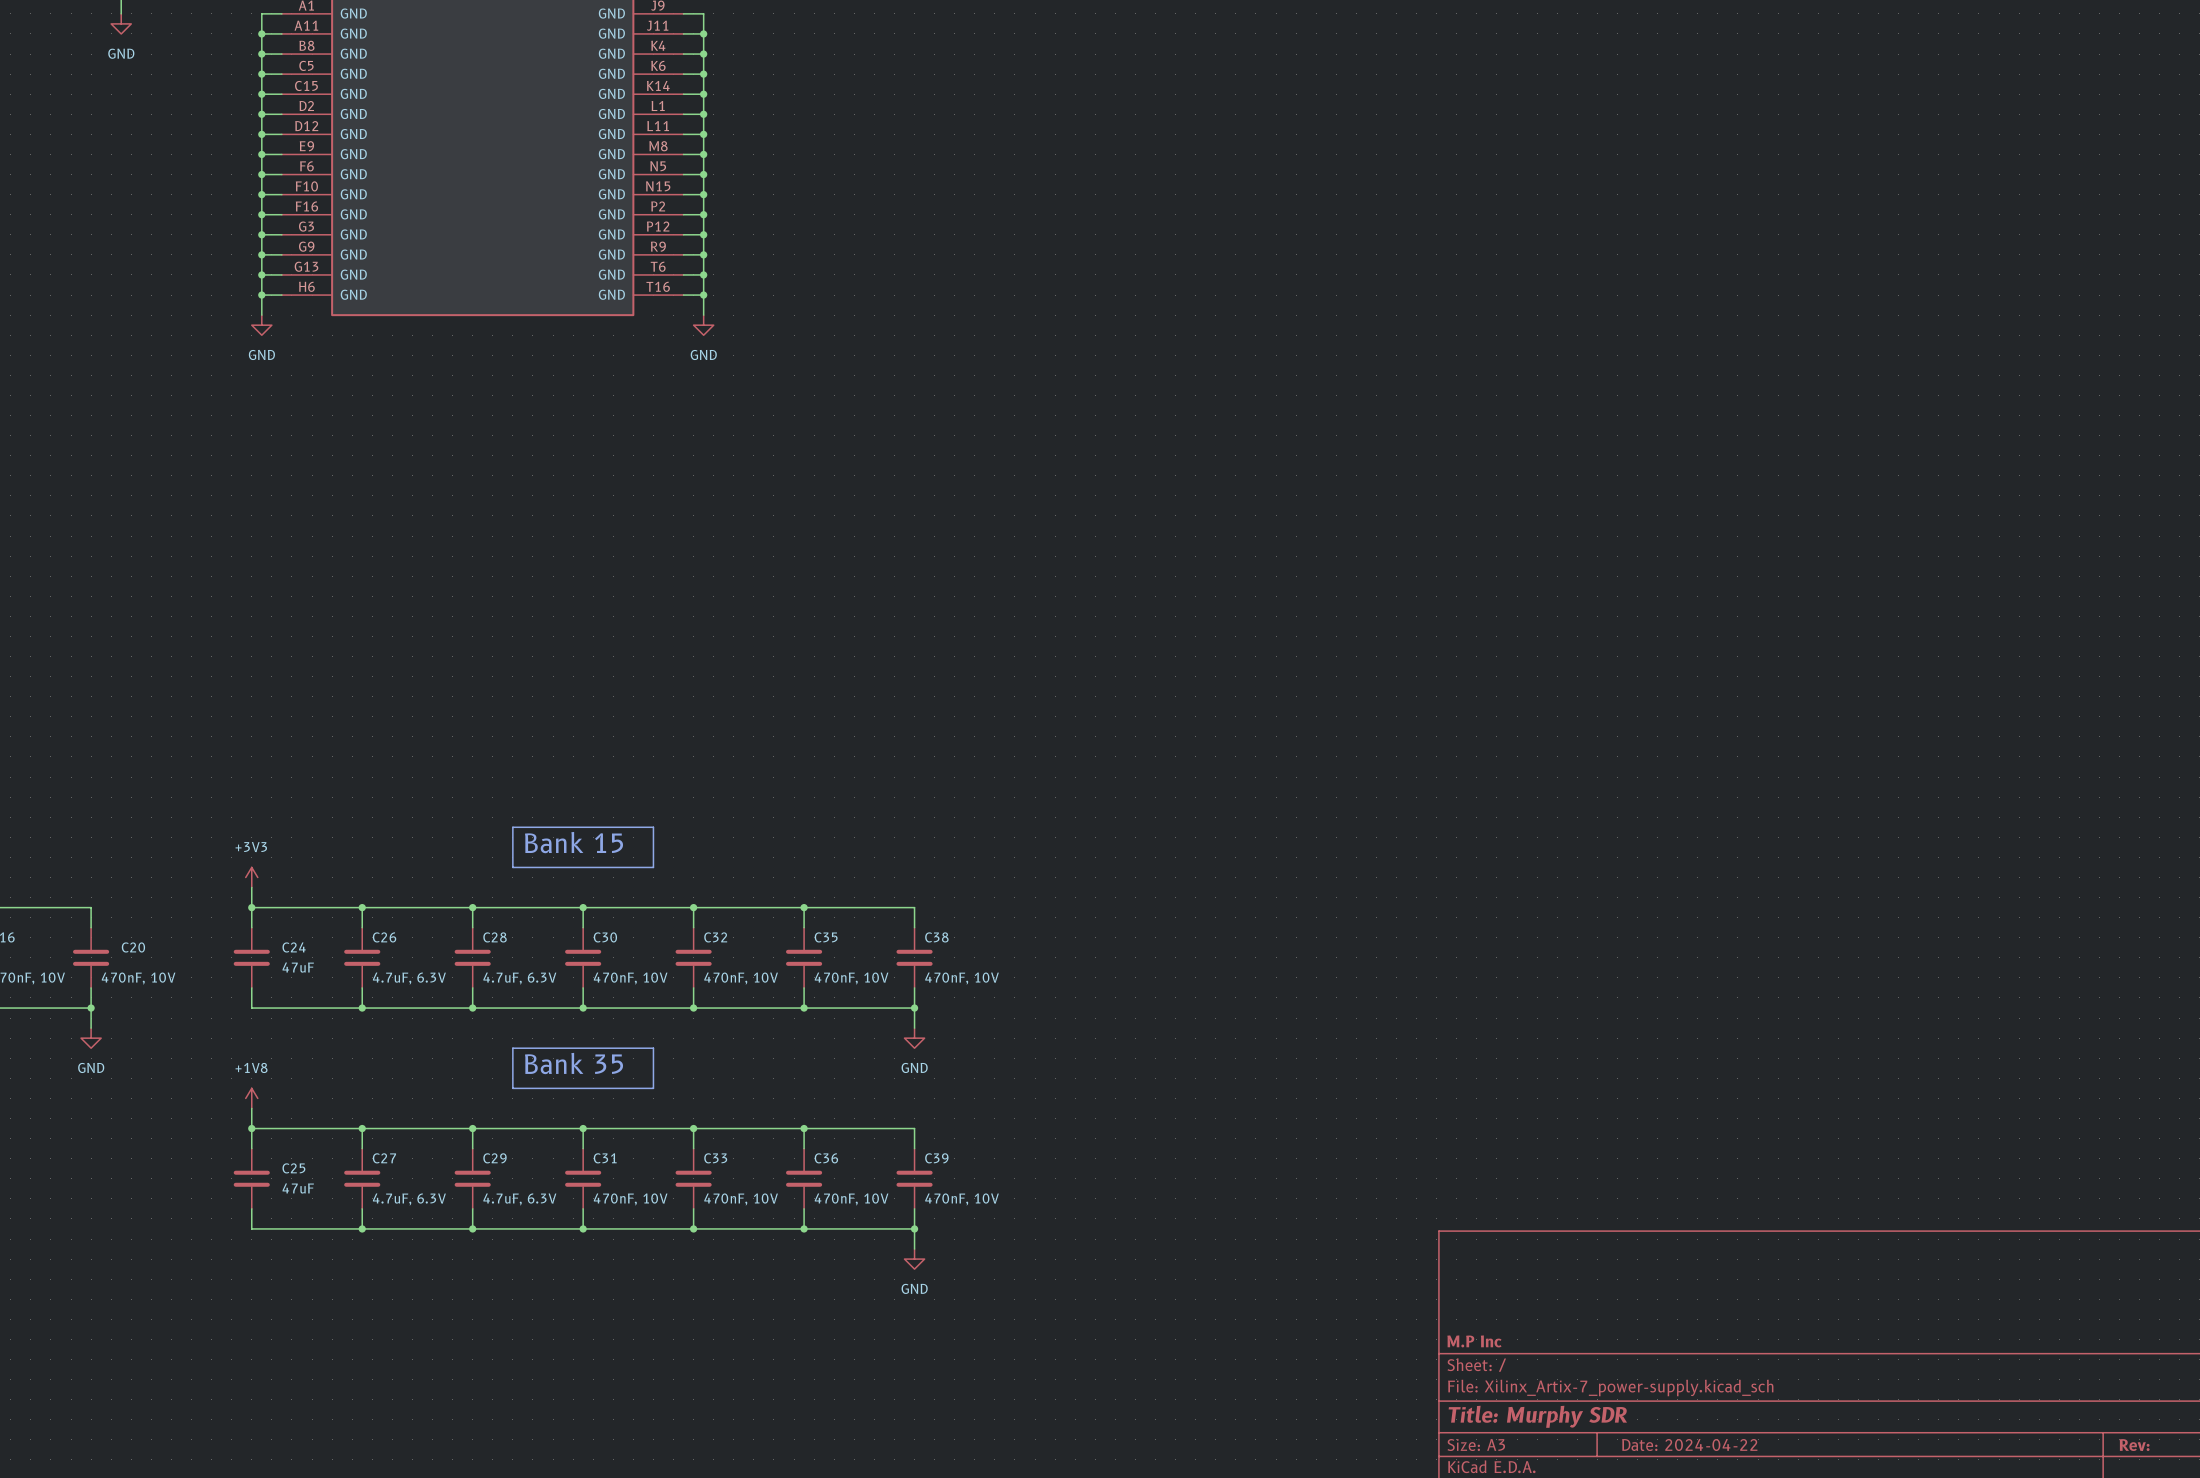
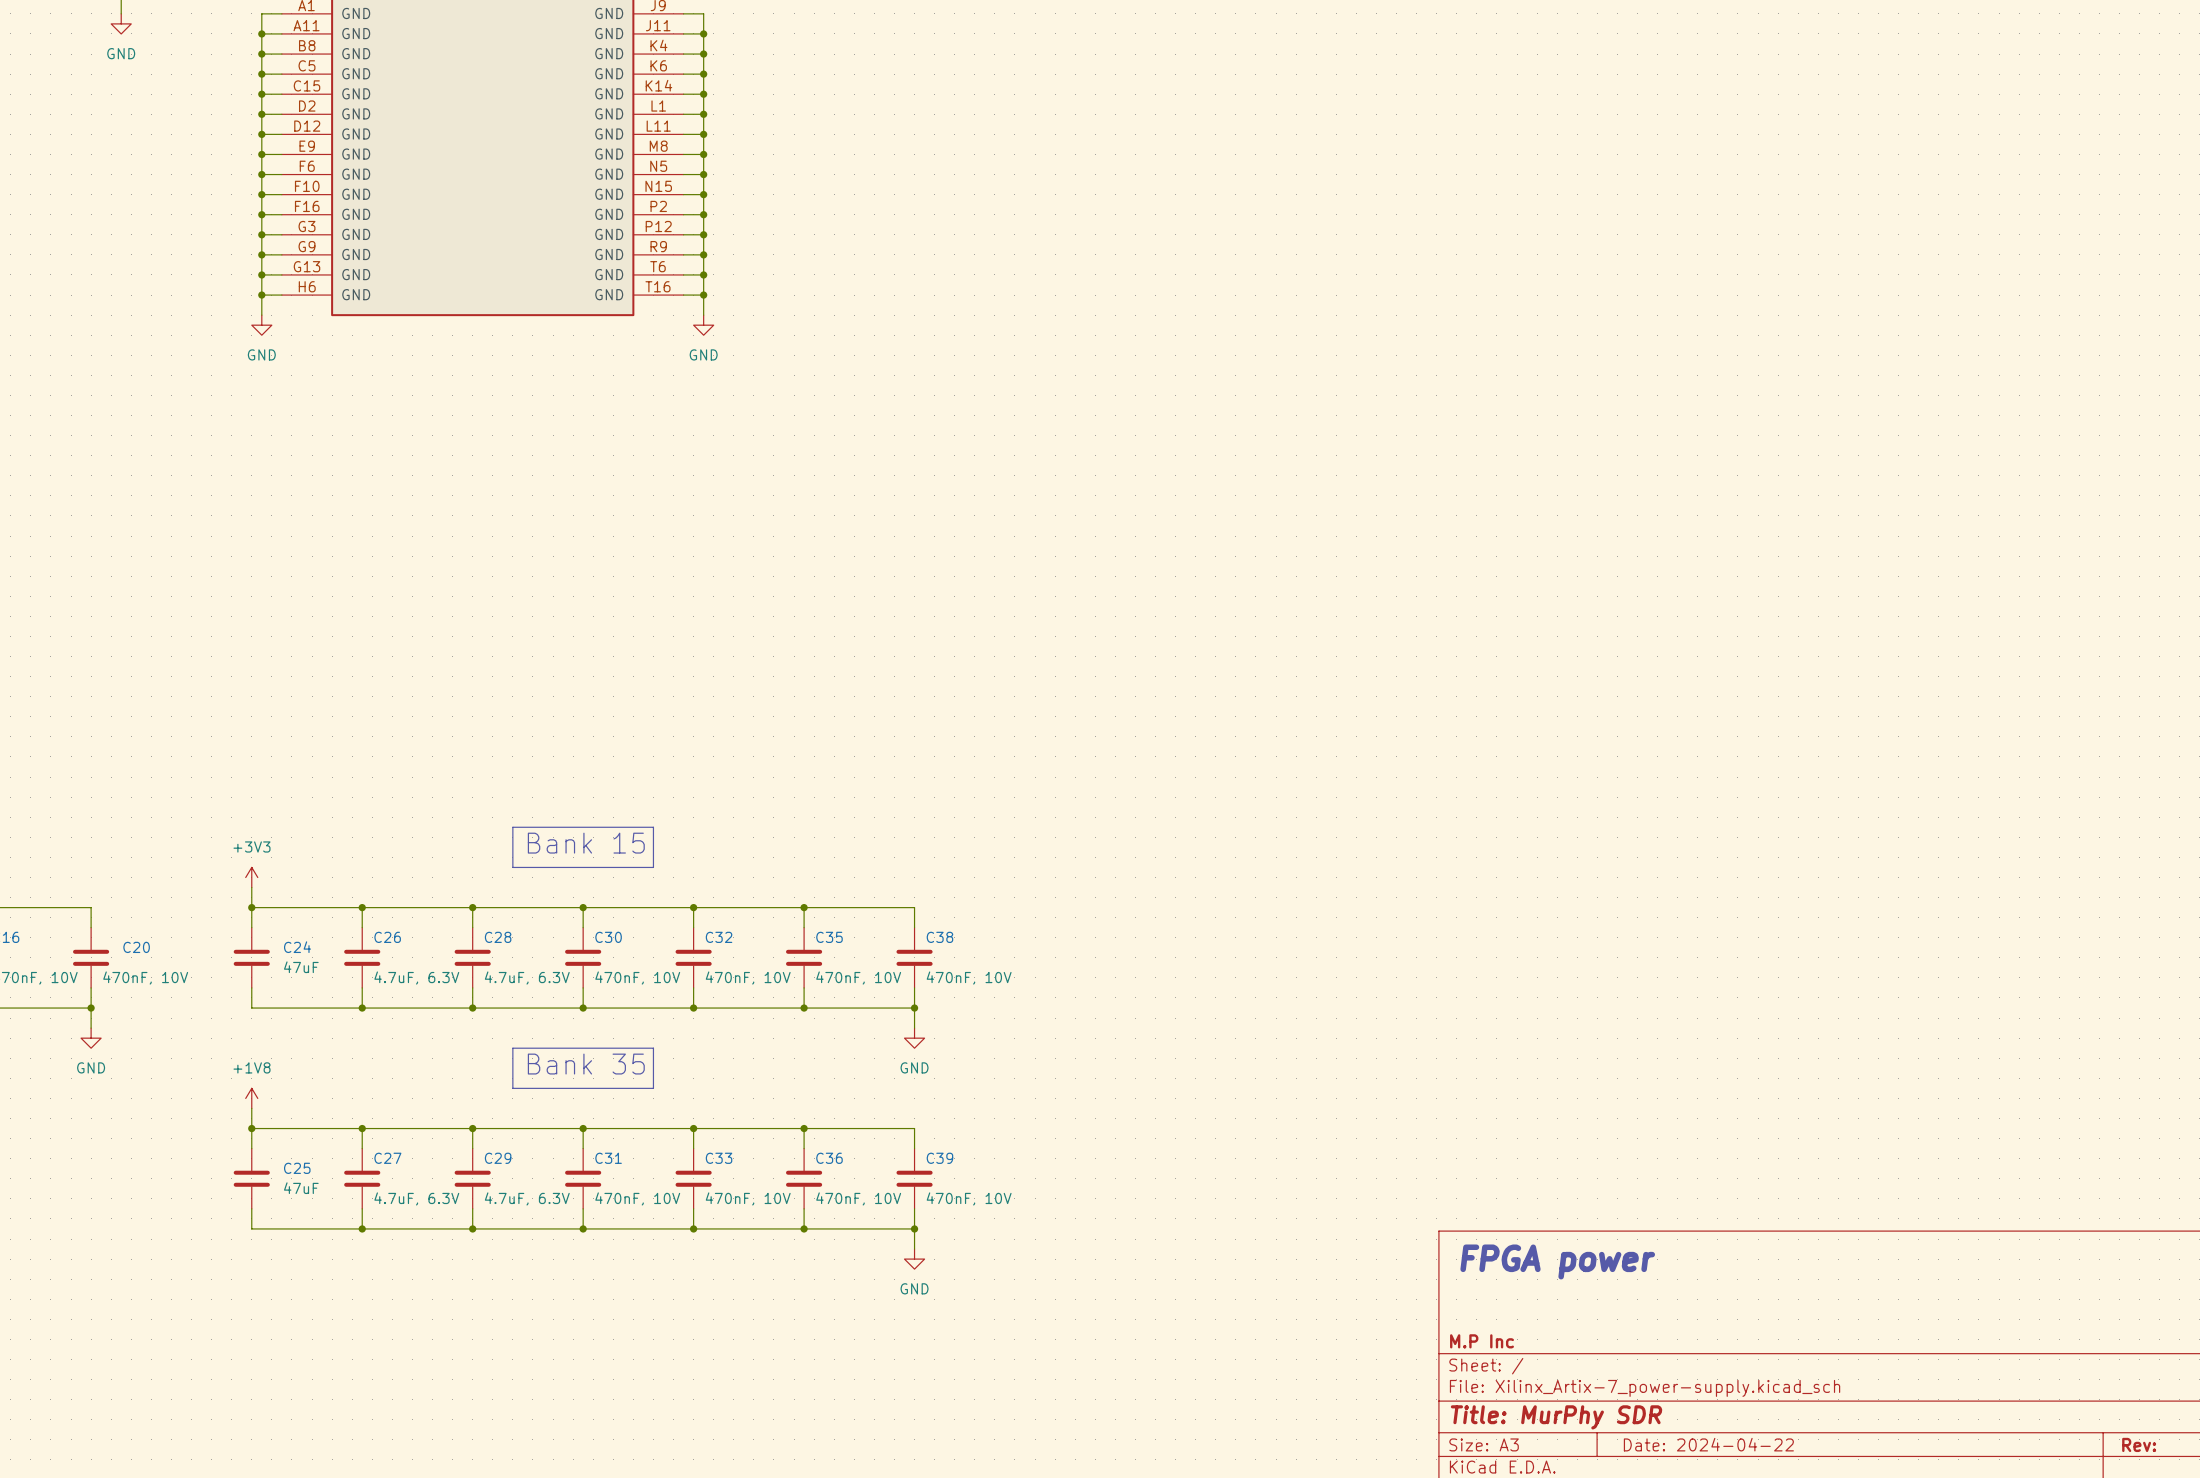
text: none -> FPGA power (1557, 1261)
title block: Title: Murphy SDR (1537, 1416) -> Title: MurPhy SDR (1556, 1417)

